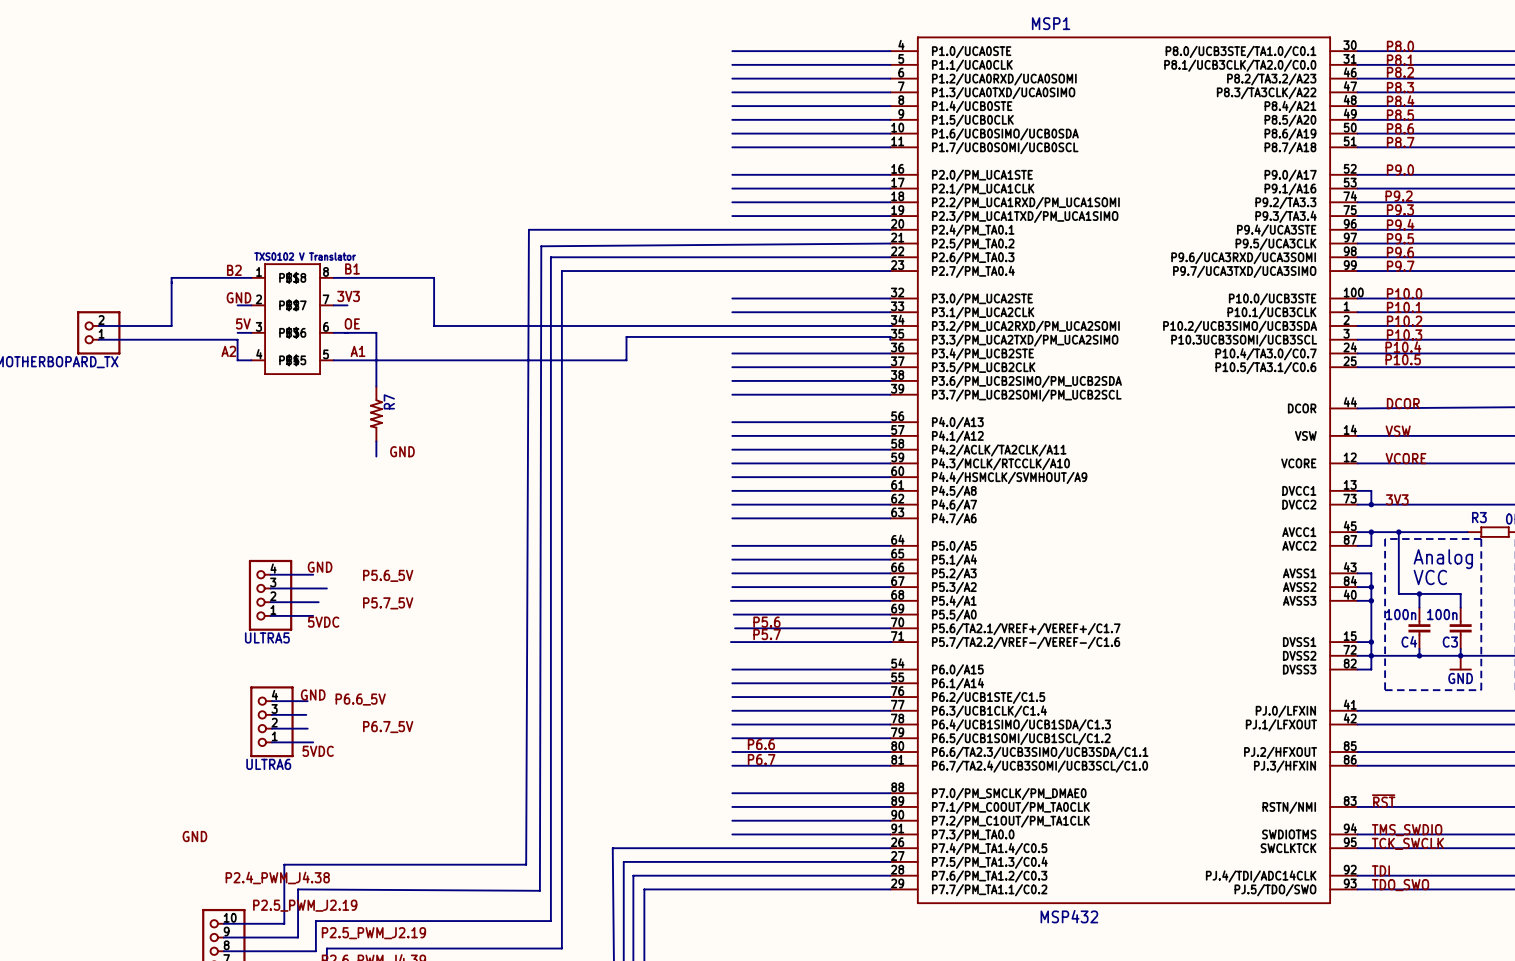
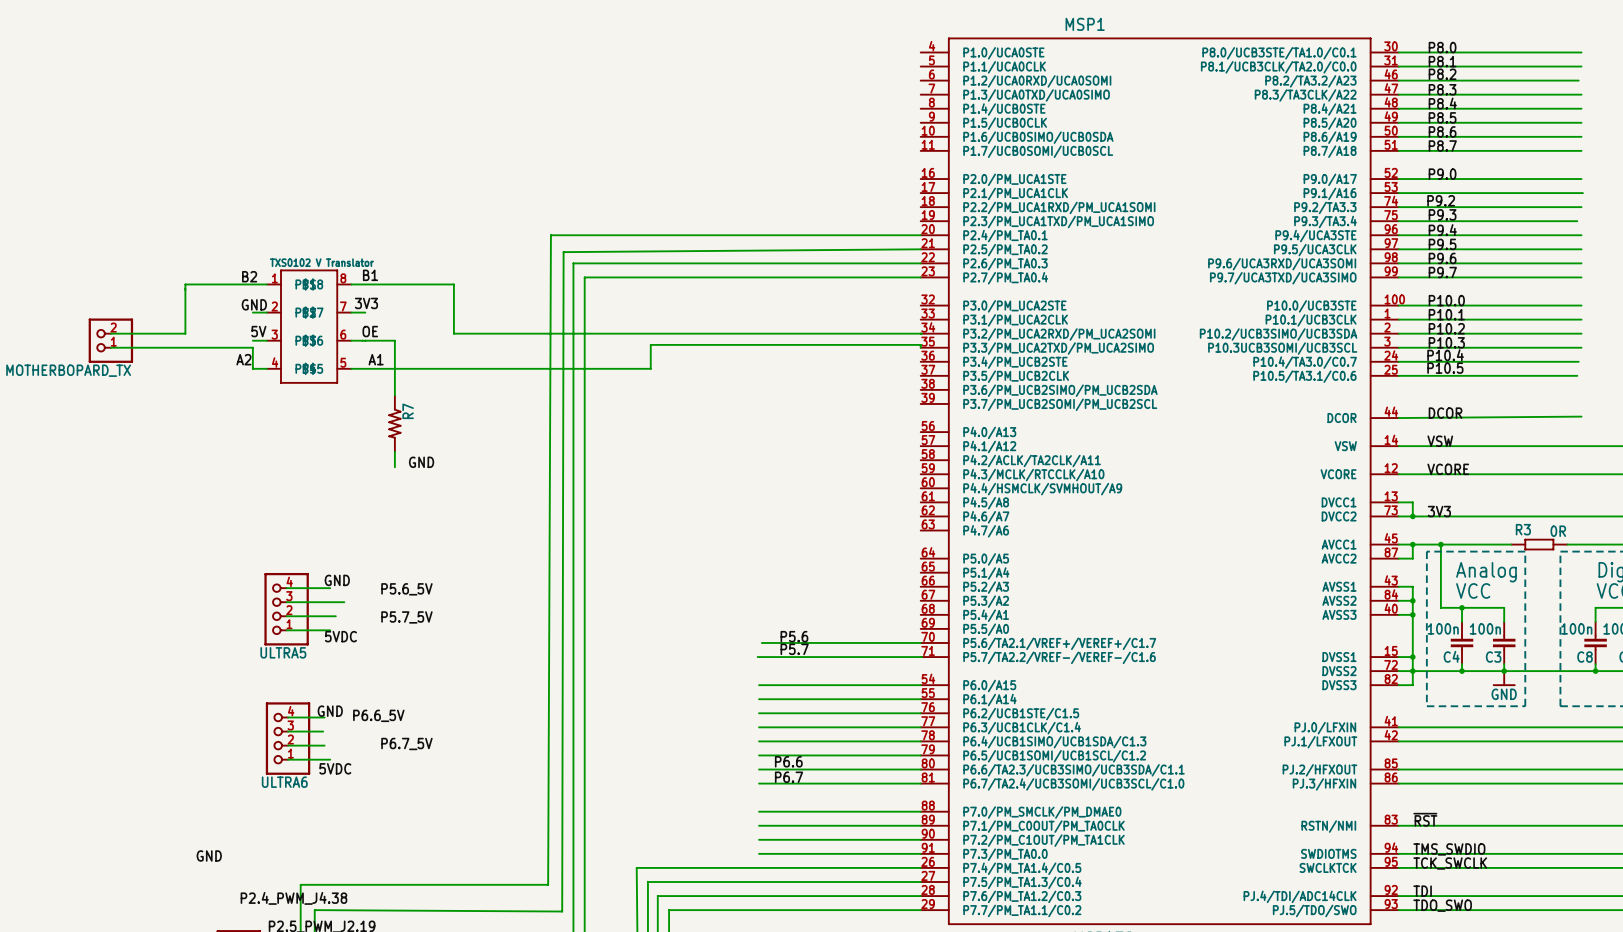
wire: (732, 51) (890, 51) -> none
wire: (732, 64) (890, 64) -> none
wire: (732, 78) (890, 78) -> none
wire: (732, 92) (890, 92) -> none
wire: (732, 106) (890, 106) -> none
wire: (732, 119) (890, 119) -> none
wire: (732, 133) (890, 133) -> none
wire: (732, 147) (890, 147) -> none
wire: (732, 174) (890, 174) -> none
wire: (732, 188) (890, 188) -> none
wire: (732, 202) (890, 202) -> none
wire: (732, 216) (890, 216) -> none
wire: (732, 298) (890, 298) -> none
wire: (732, 312) (890, 312) -> none
wire: (732, 353) (890, 353) -> none
wire: (732, 367) (890, 367) -> none
wire: (732, 380) (890, 380) -> none
wire: (732, 394) (890, 394) -> none
wire: (732, 422) (890, 422) -> none
wire: (732, 435) (890, 435) -> none
wire: (732, 449) (890, 449) -> none
wire: (732, 463) (890, 463) -> none
wire: (732, 477) (890, 477) -> none
wire: (732, 490) (890, 490) -> none
wire: (732, 504) (890, 504) -> none
wire: (732, 518) (890, 518) -> none
wire: (732, 545) (890, 545) -> none
wire: (732, 559) (890, 559) -> none
wire: (732, 573) (890, 573) -> none
wire: (732, 587) (890, 587) -> none
wire: (730, 600) (890, 600) -> none
wire: (733, 614) (890, 614) -> none

